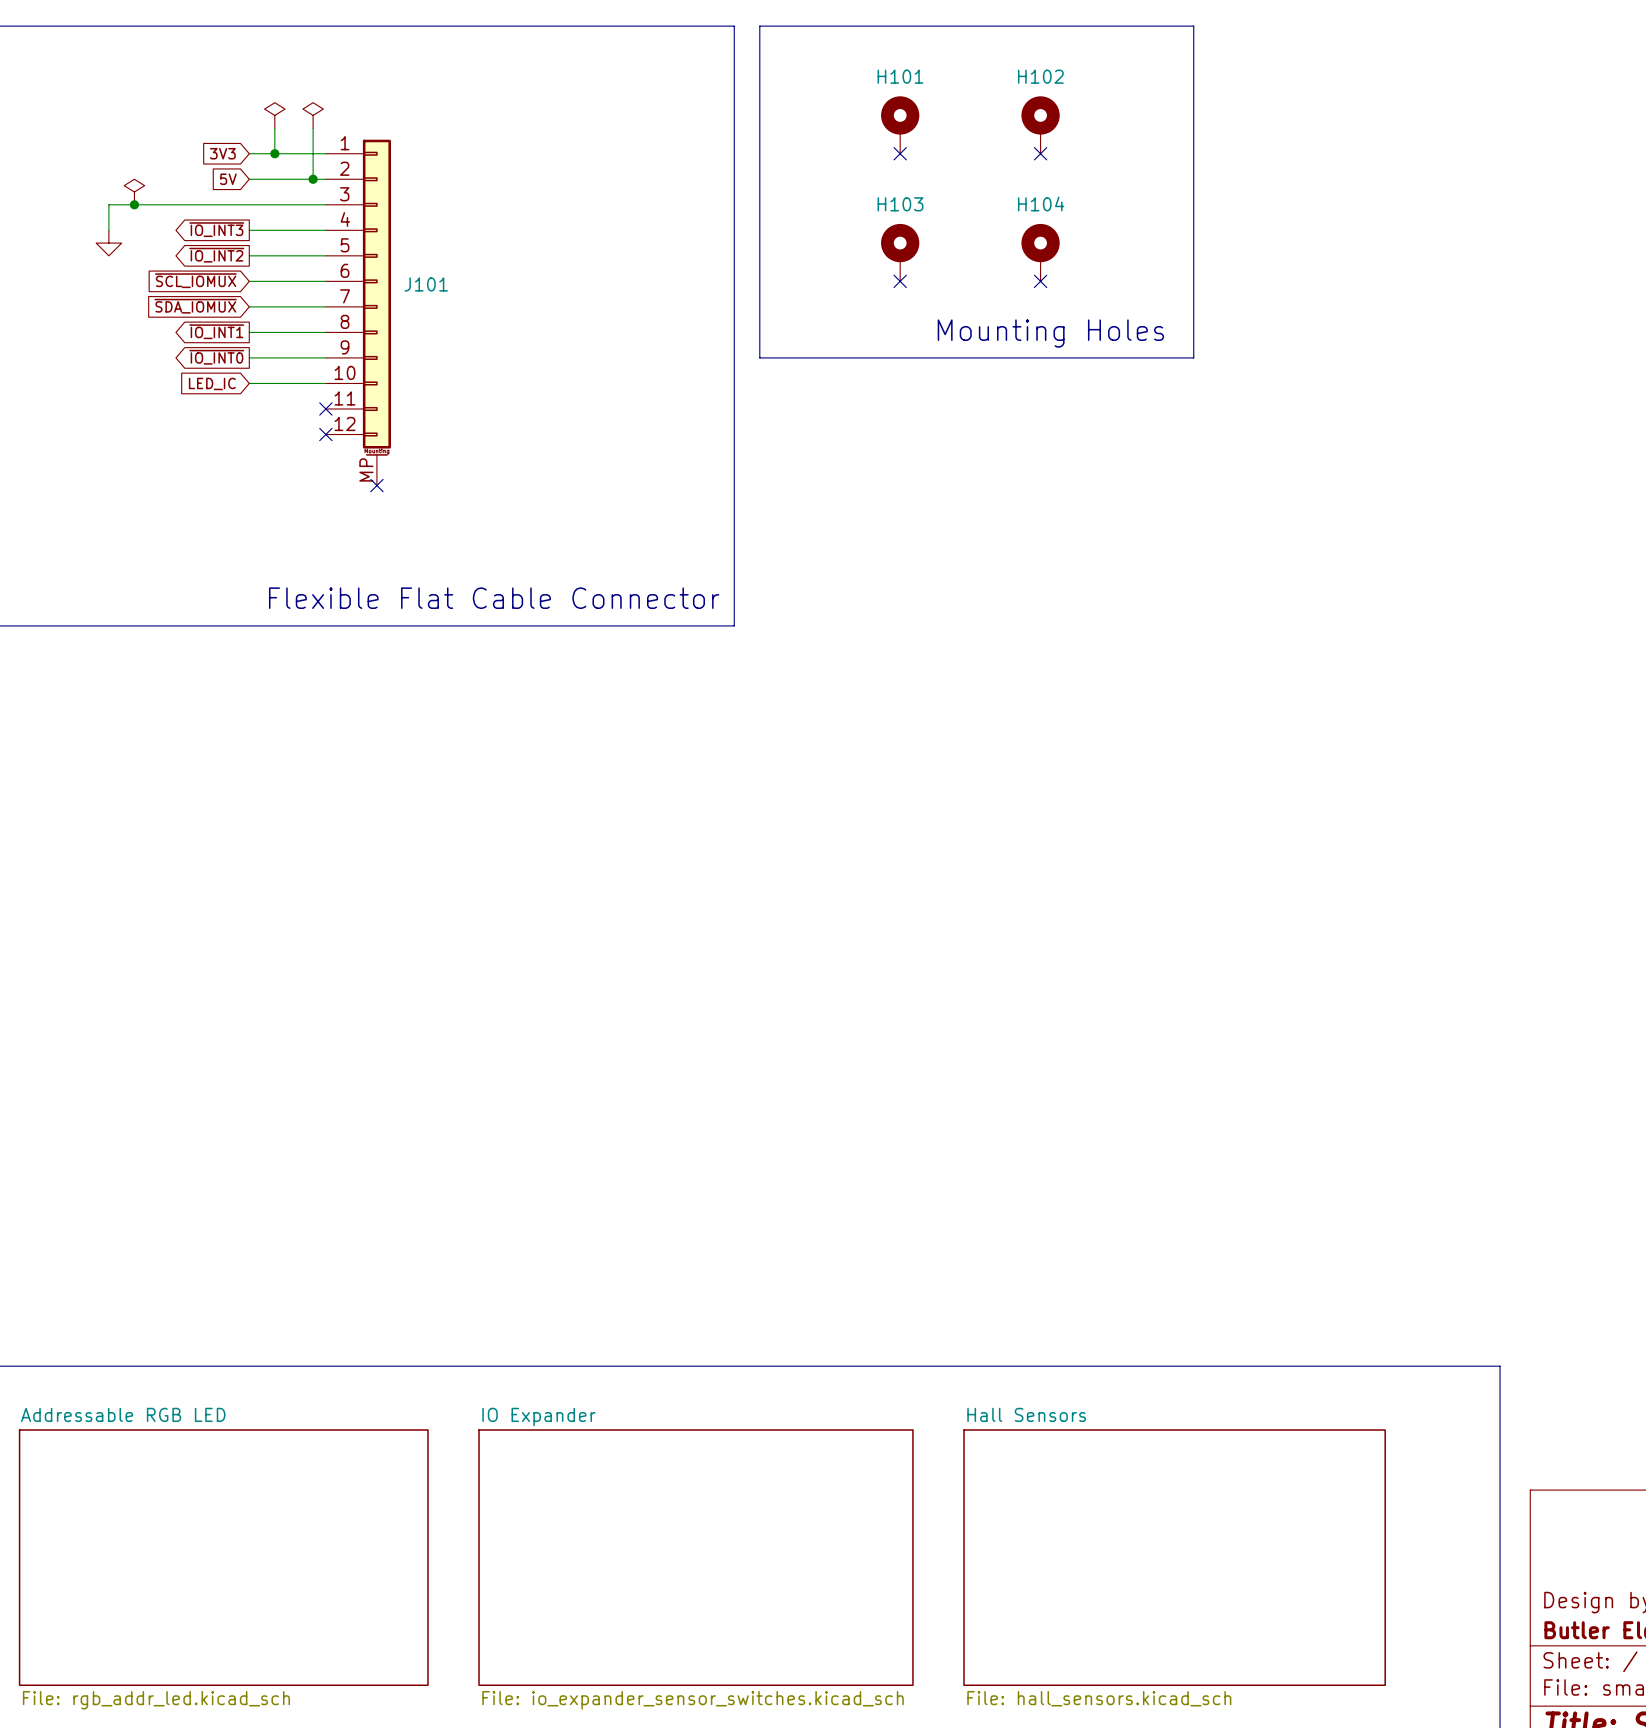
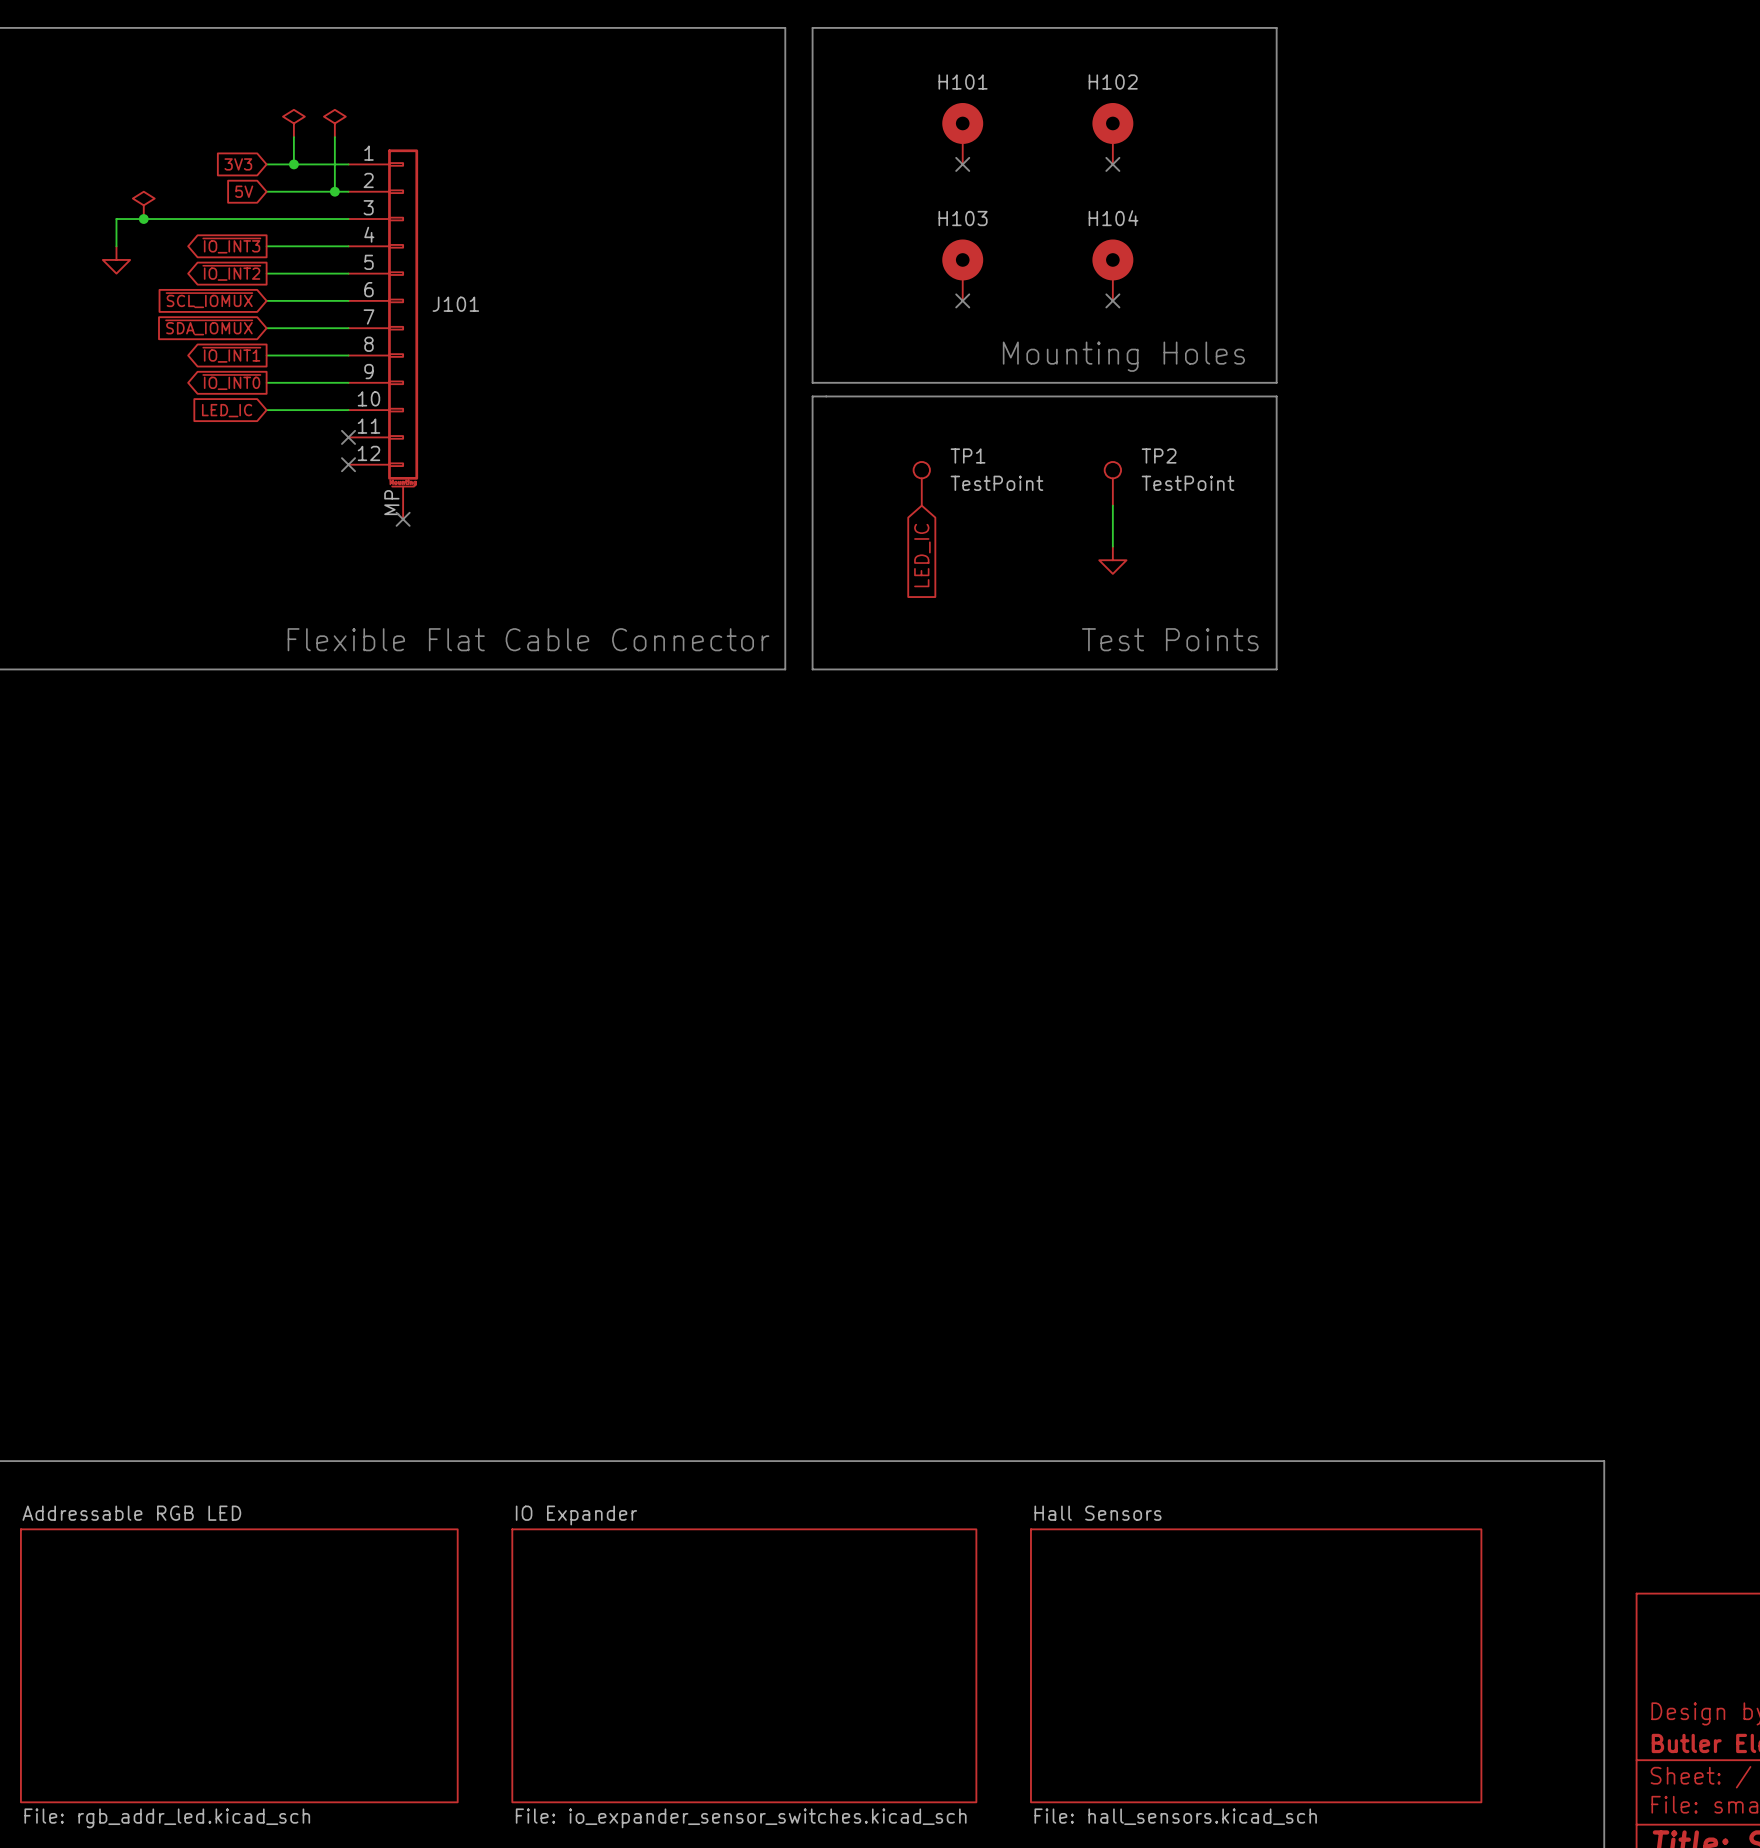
line: none -> (812, 396) (1276, 396) (1276, 669) (812, 669) (812, 396)
TP1: none -> TestPoint (921, 483)
TP2: none -> TestPoint (1112, 483)
wire: none -> (1112, 505) (1112, 546)
global label: none -> LED_IC (922, 555)
power symbol: none -> (1112, 560)
text: none -> Test Points (1170, 639)

